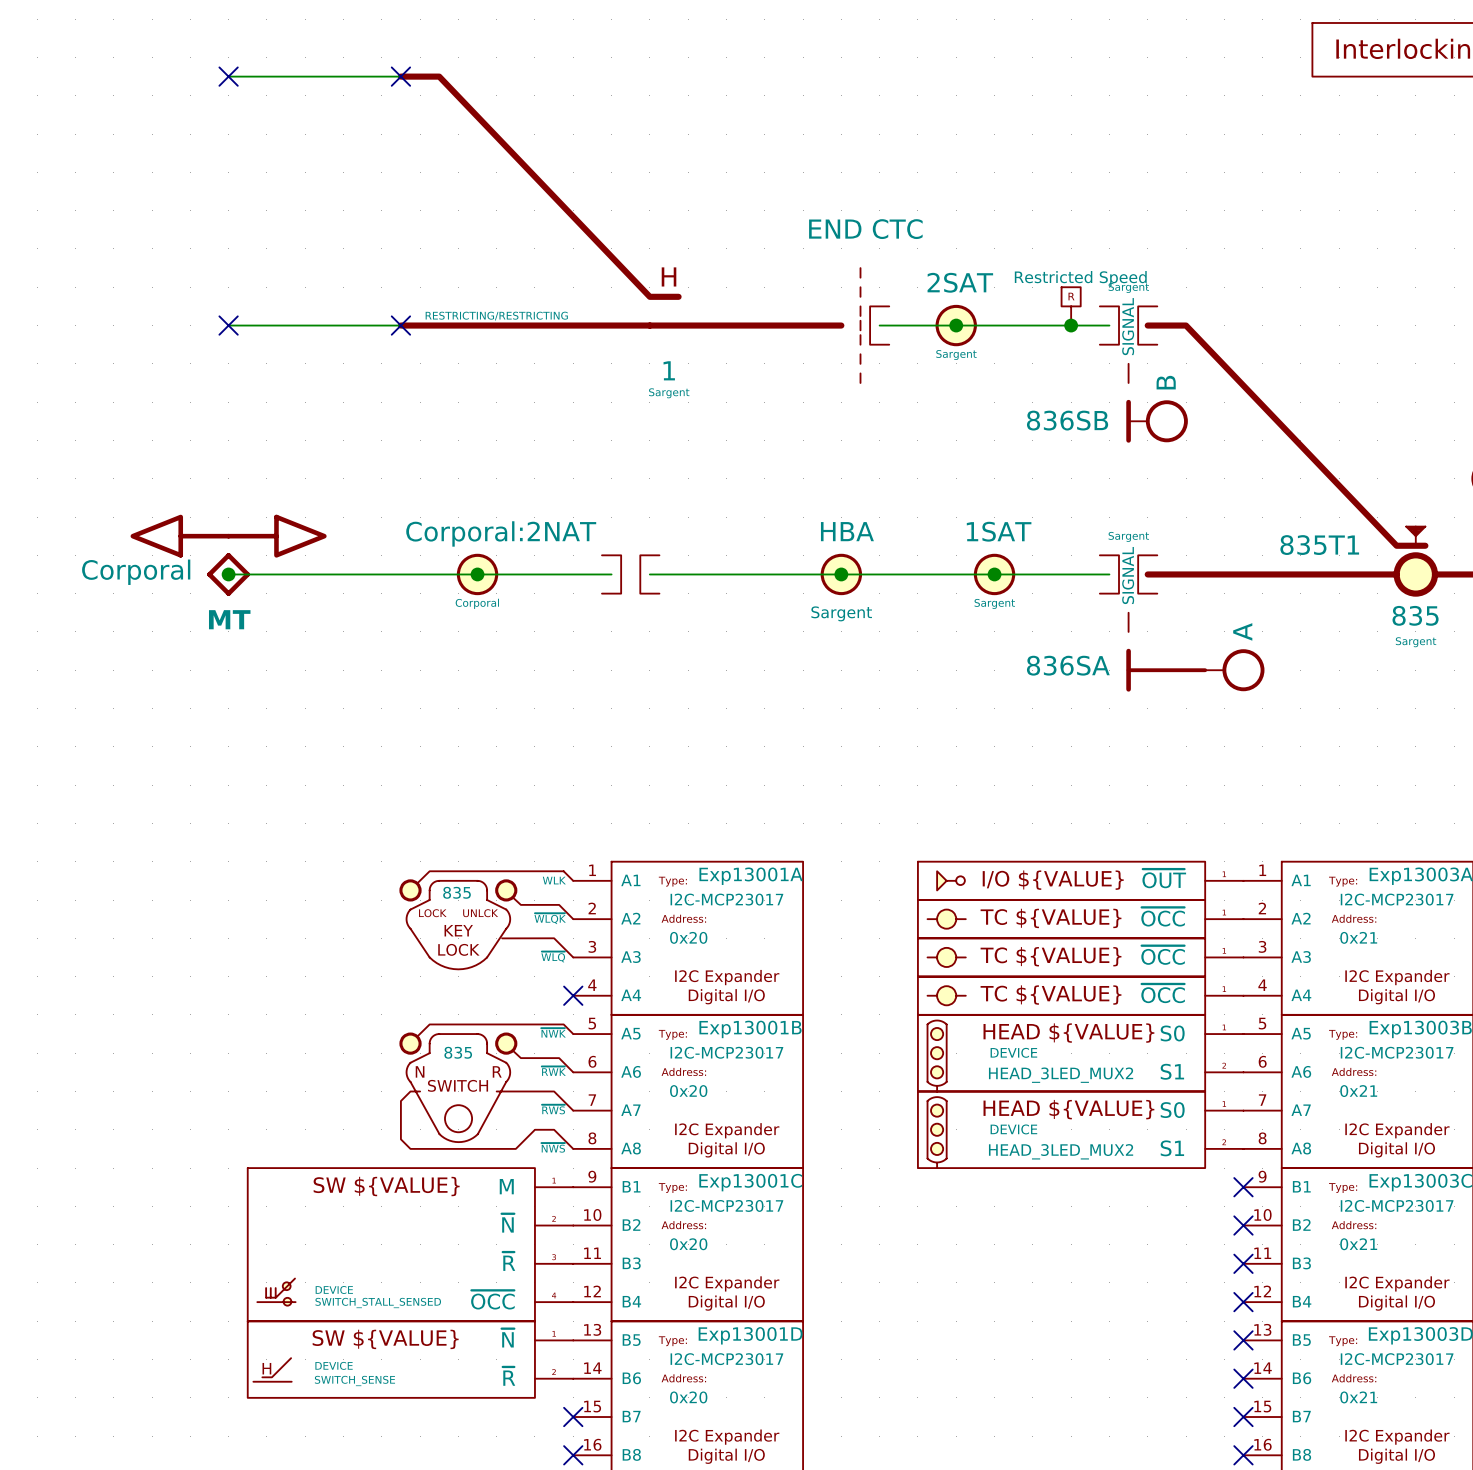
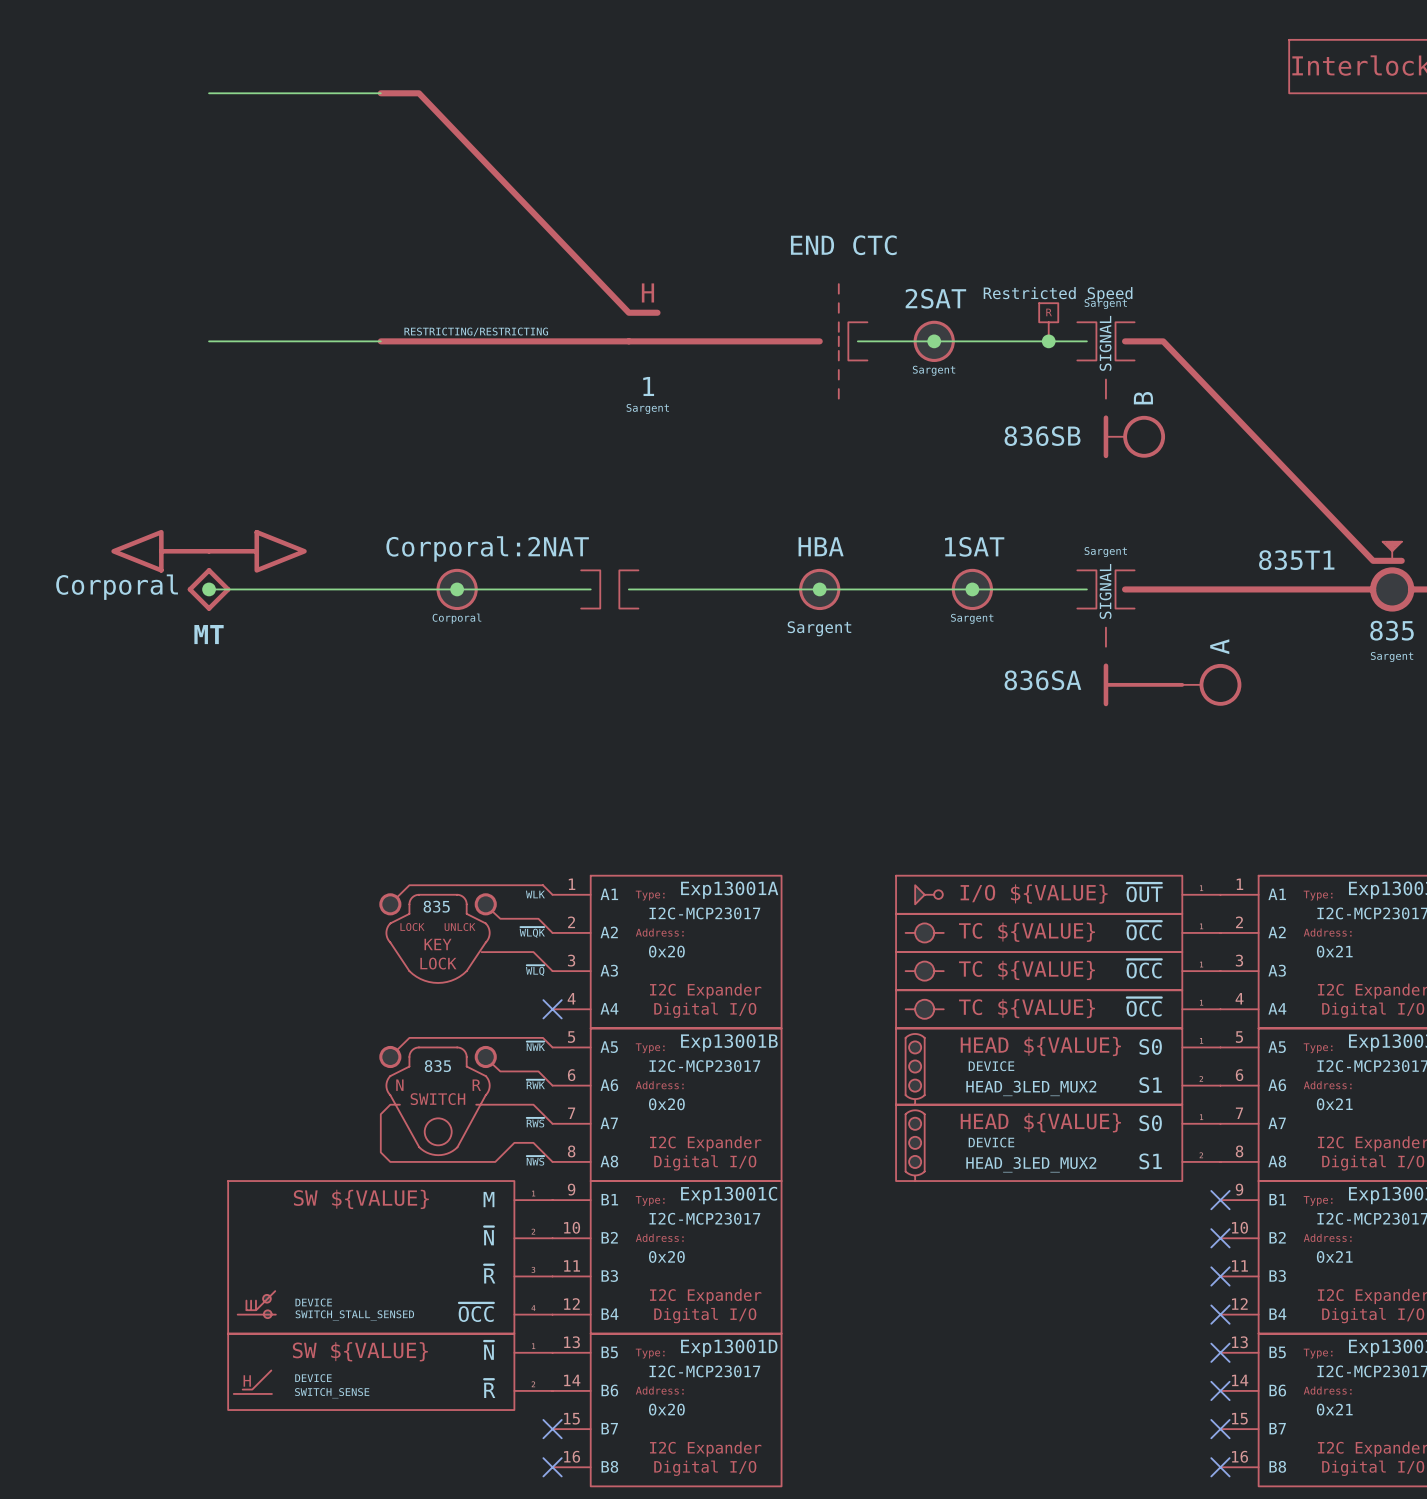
no-connect mark: (228, 76) -> none
no-connect mark: (400, 76) -> none
no-connect mark: (228, 325) -> none
no-connect mark: (400, 325) -> none

